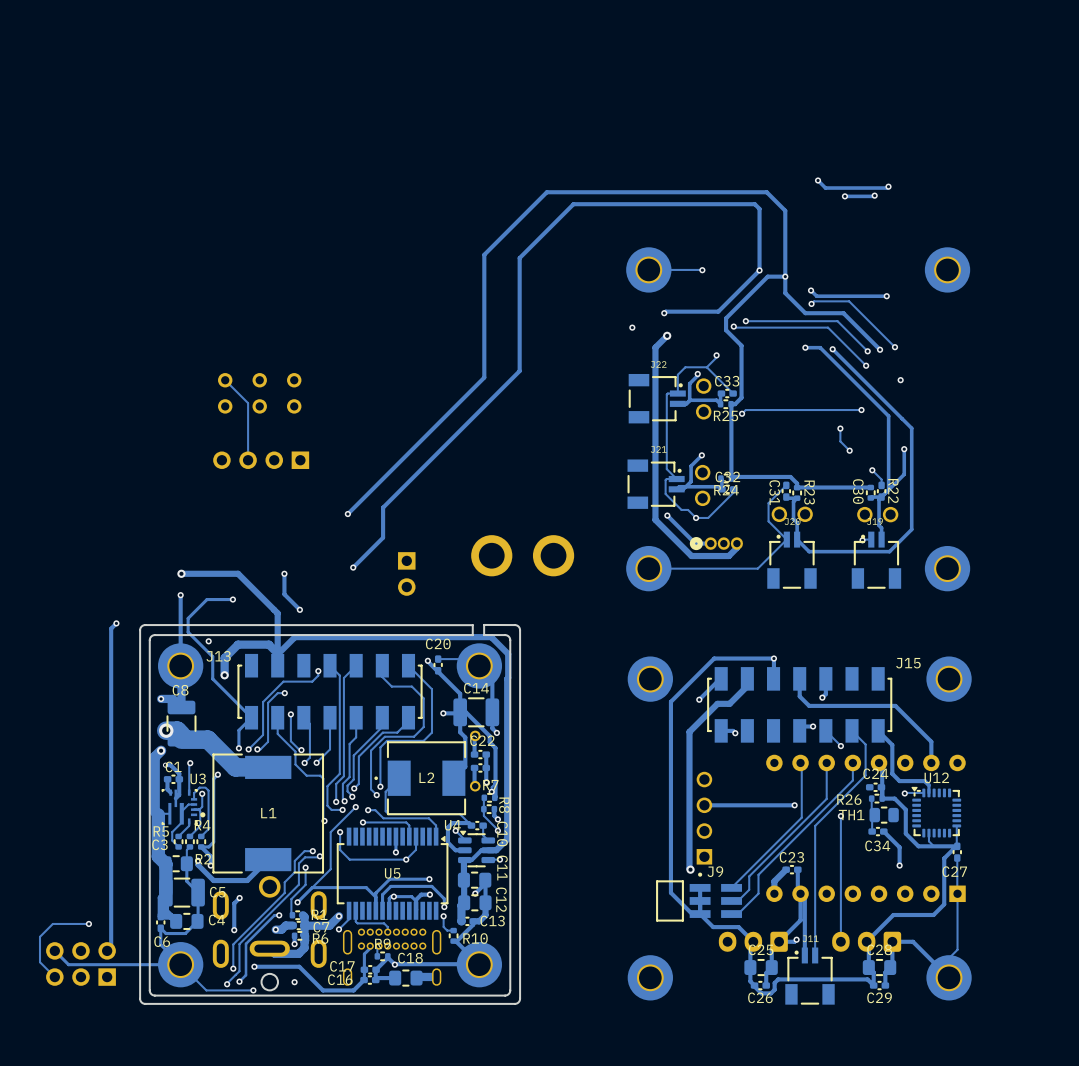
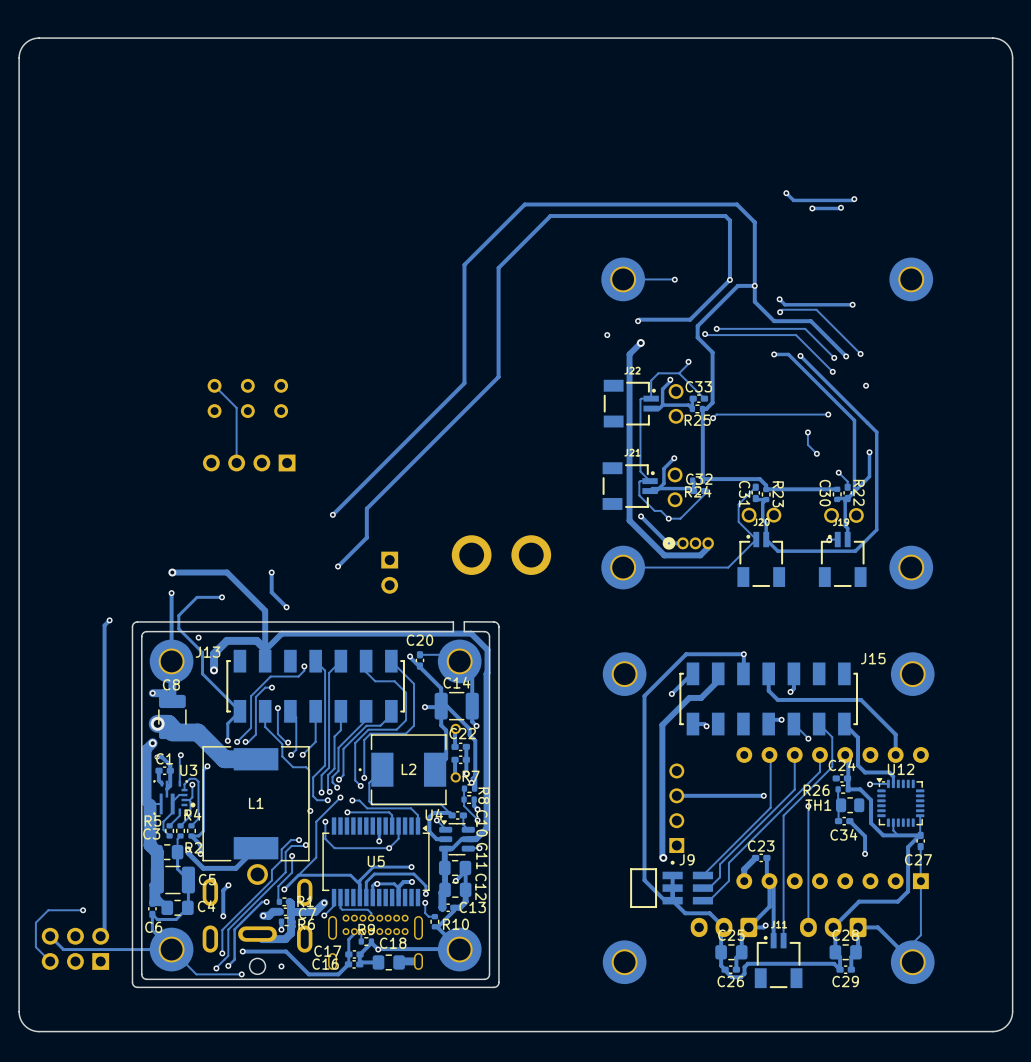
board edge: none -> (992, 38) (38, 38) (24, 43) (19, 57) (19, 1011) (24, 1025) (38, 1031) (992, 1031) (1006, 1025) (1012, 1011) (1012, 57) (1006, 43) (992, 38)

